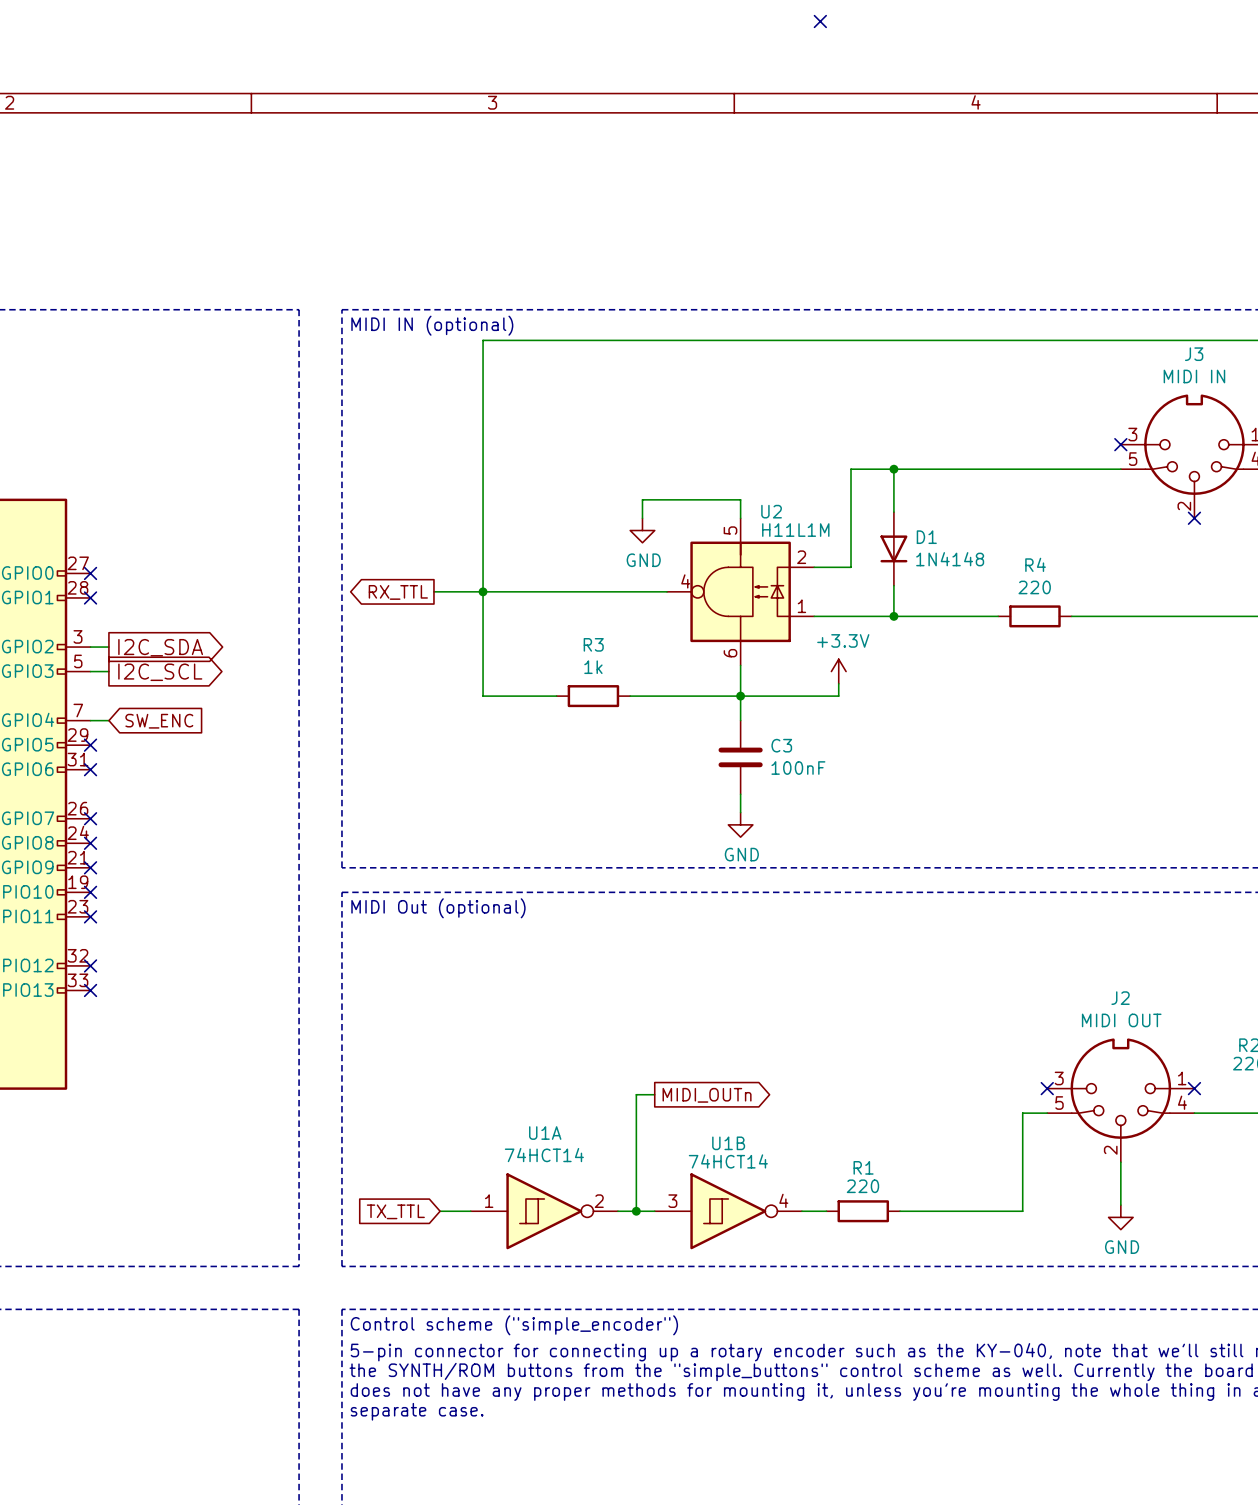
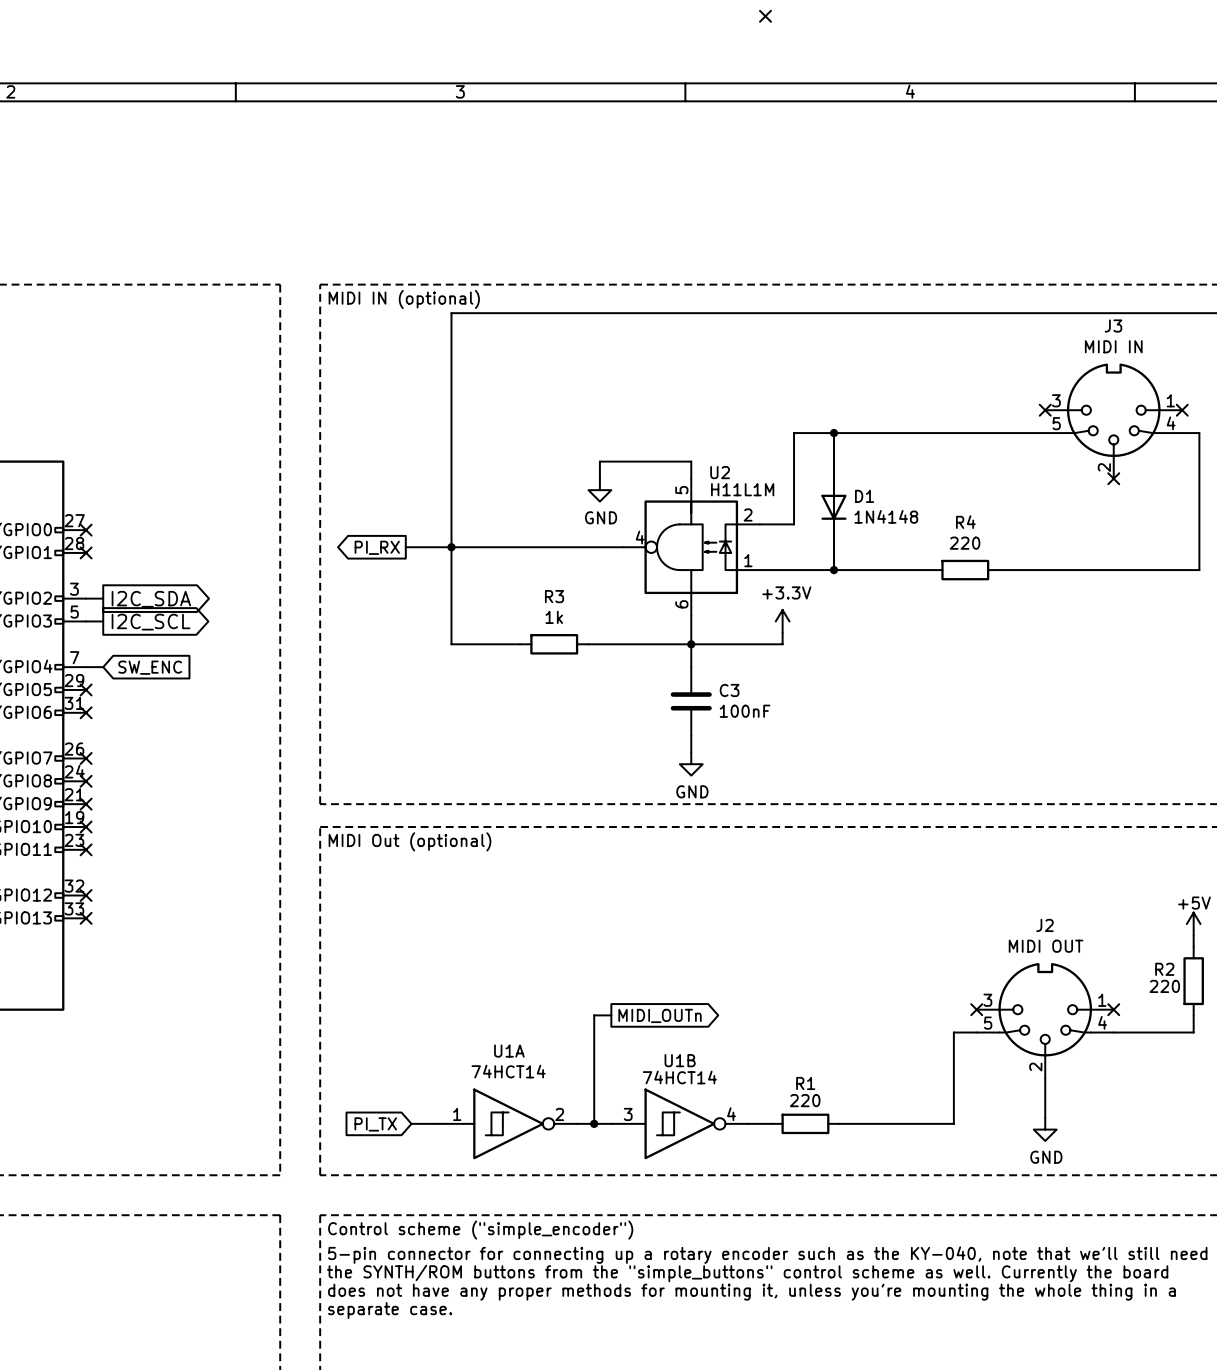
global label: RX_TTL (398, 592) -> PI_RX (377, 547)
global label: TX_TTL (395, 1211) -> PI_TX (375, 1124)

